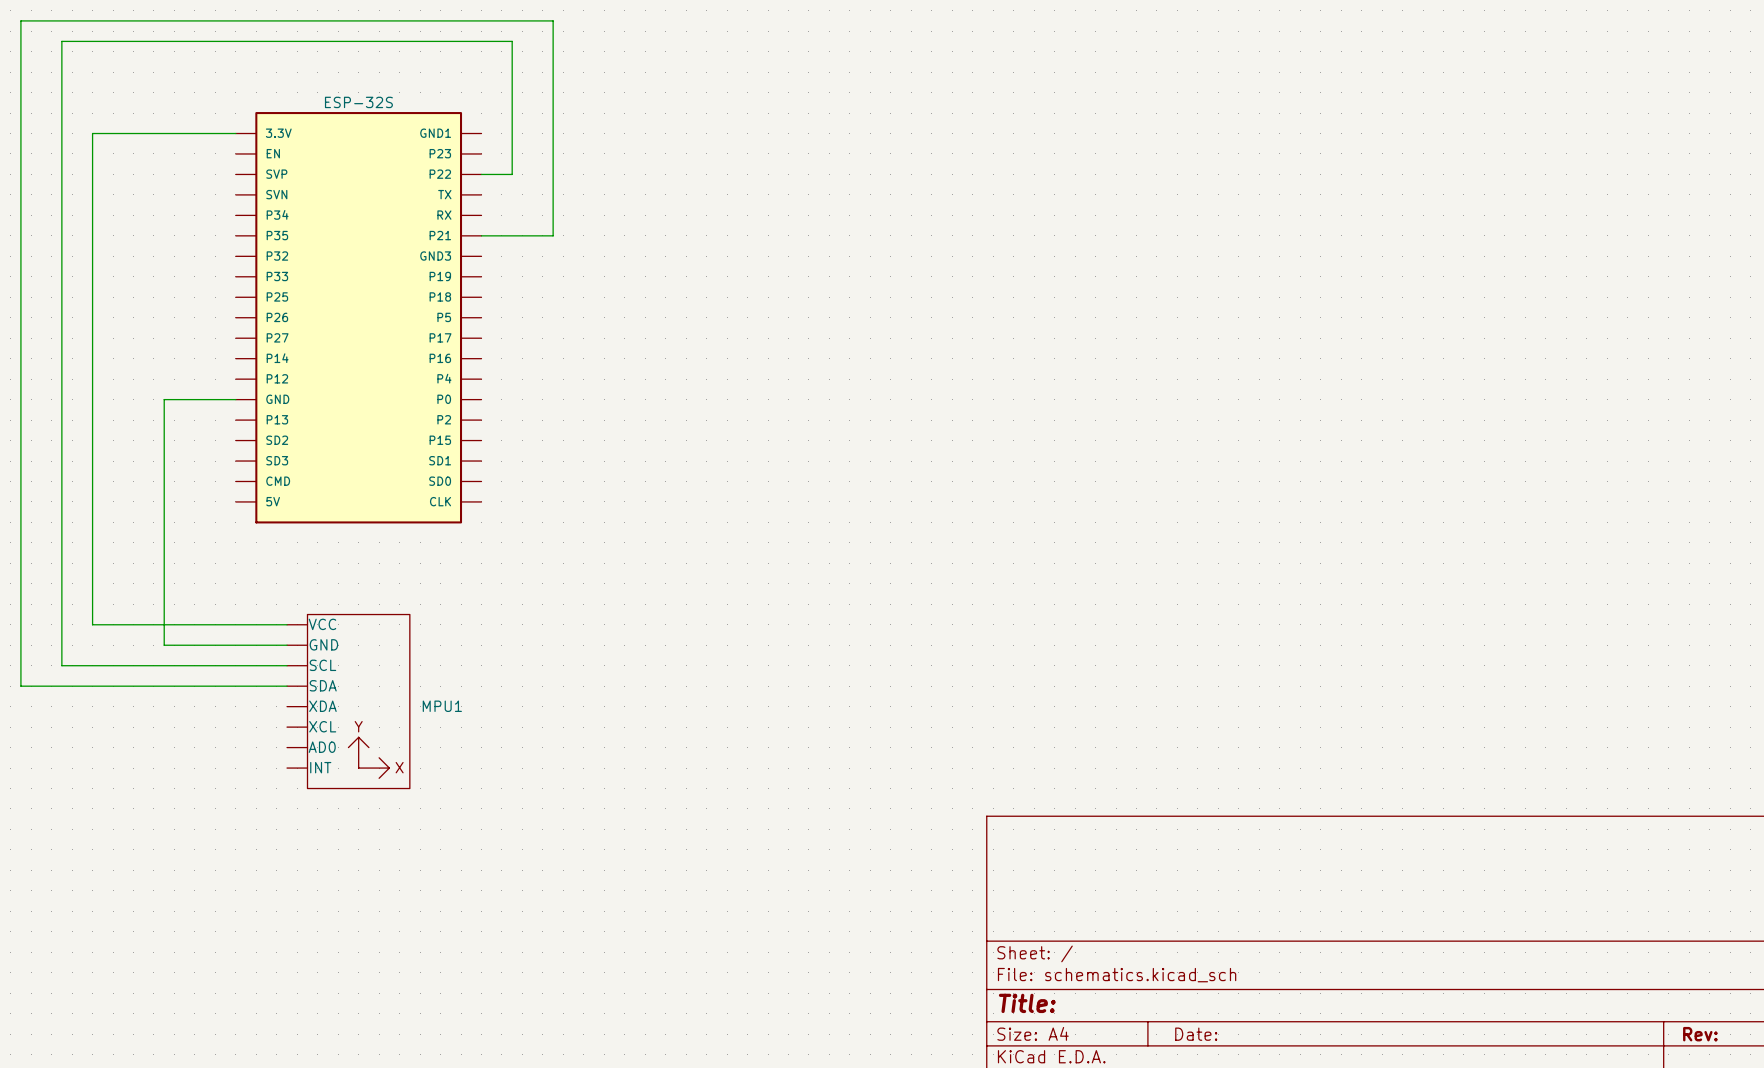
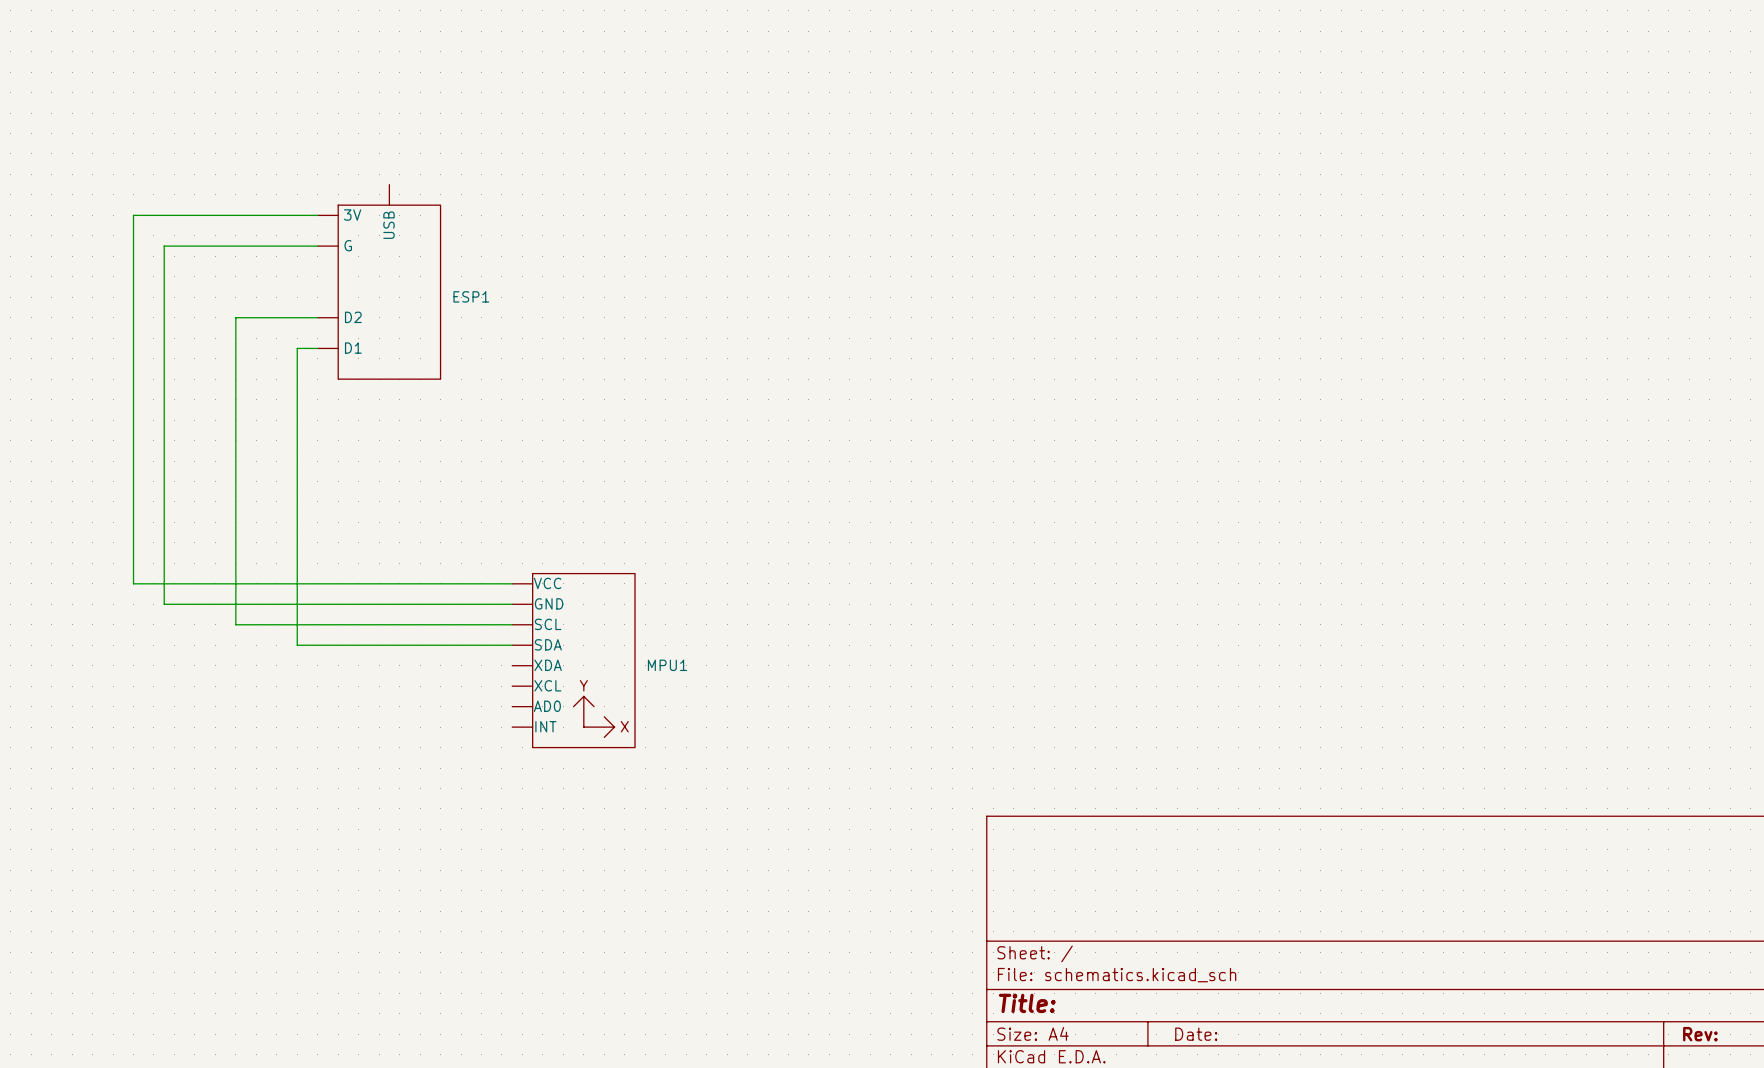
wire: (235, 133) (92, 133) (92, 624) (235, 624) -> (317, 317) (235, 317) (235, 624)
wire: (481, 174) (512, 174) (512, 41) (61, 41) (61, 665) (287, 665) -> none
wire: none -> (317, 215) (133, 215) (133, 583) (512, 583)
wire: (481, 235) (553, 235) (553, 20) (20, 20) (20, 686) (287, 686) -> none
ESP1: none -> (379, 281)
part: ESP-32S (358, 317) -> none
wire: none -> (317, 348) (297, 348) (297, 645) (512, 645)
wire: (164, 399) (235, 399) -> (164, 399) (164, 246) (317, 246)
wire: (164, 604) (164, 645) (287, 645) -> (164, 604) (512, 604)
wire: none -> (287, 624) (512, 624)
MPU1 position: (348, 701) -> (573, 660)

